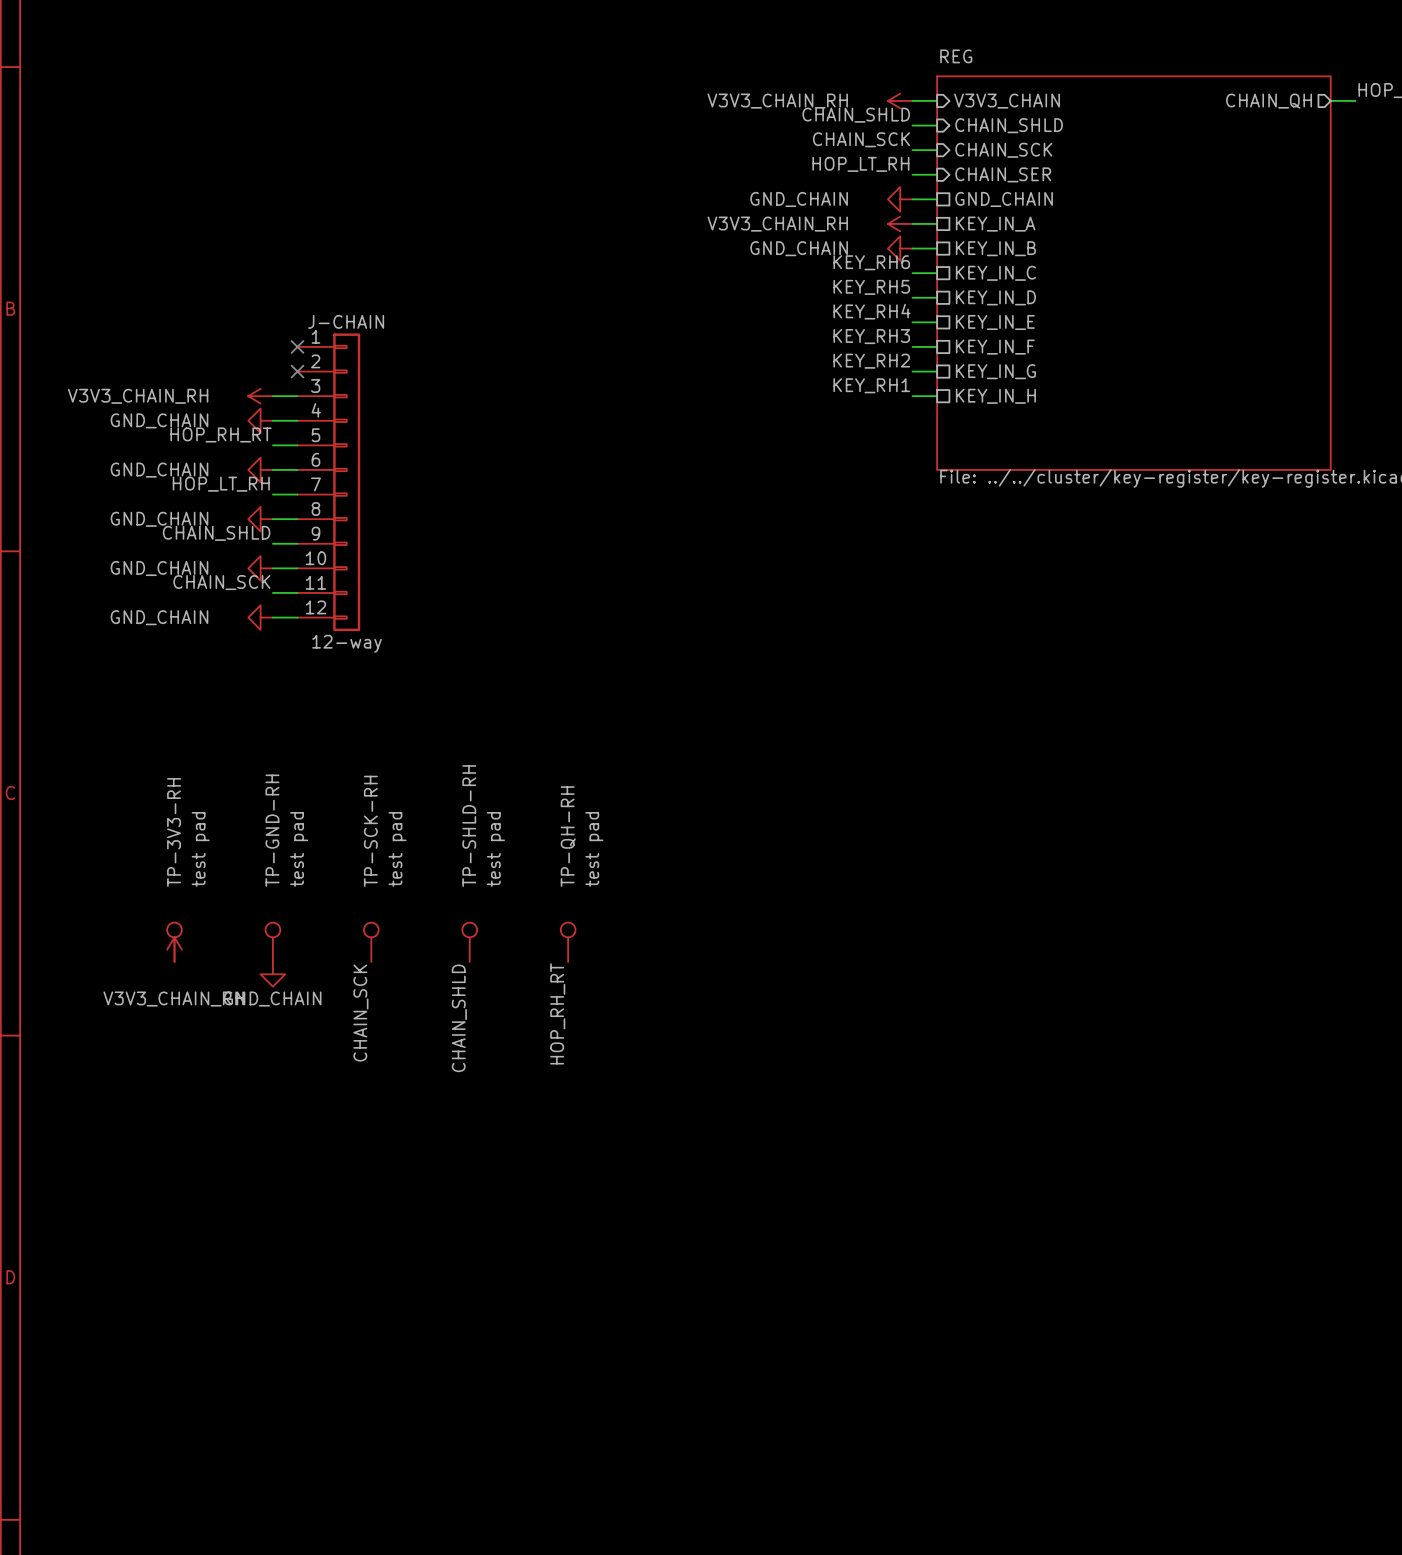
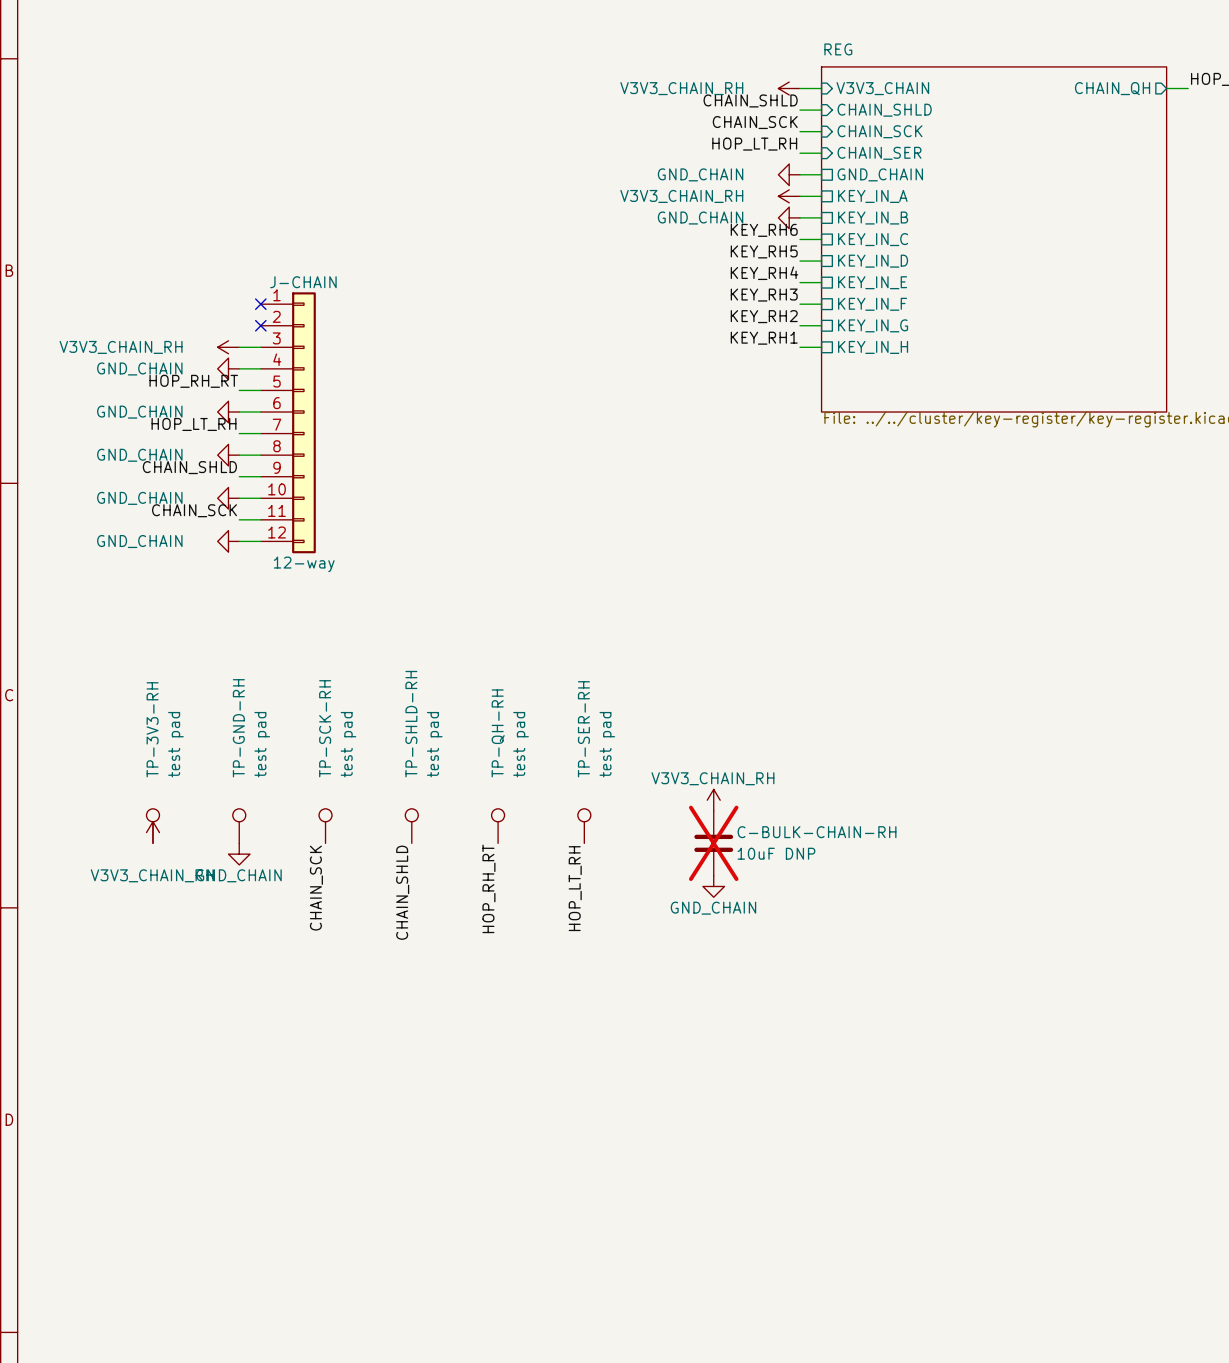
power symbol: none -> V3V3_CHAIN_RH (713, 800)
TP-SER-RH: none -> test pad (584, 826)
C-BULK-CHAIN-RH: none -> 10uF DNP (713, 843)
power symbol: none -> GND_CHAIN (713, 886)
label: none -> HOP_LT_RH (575, 888)

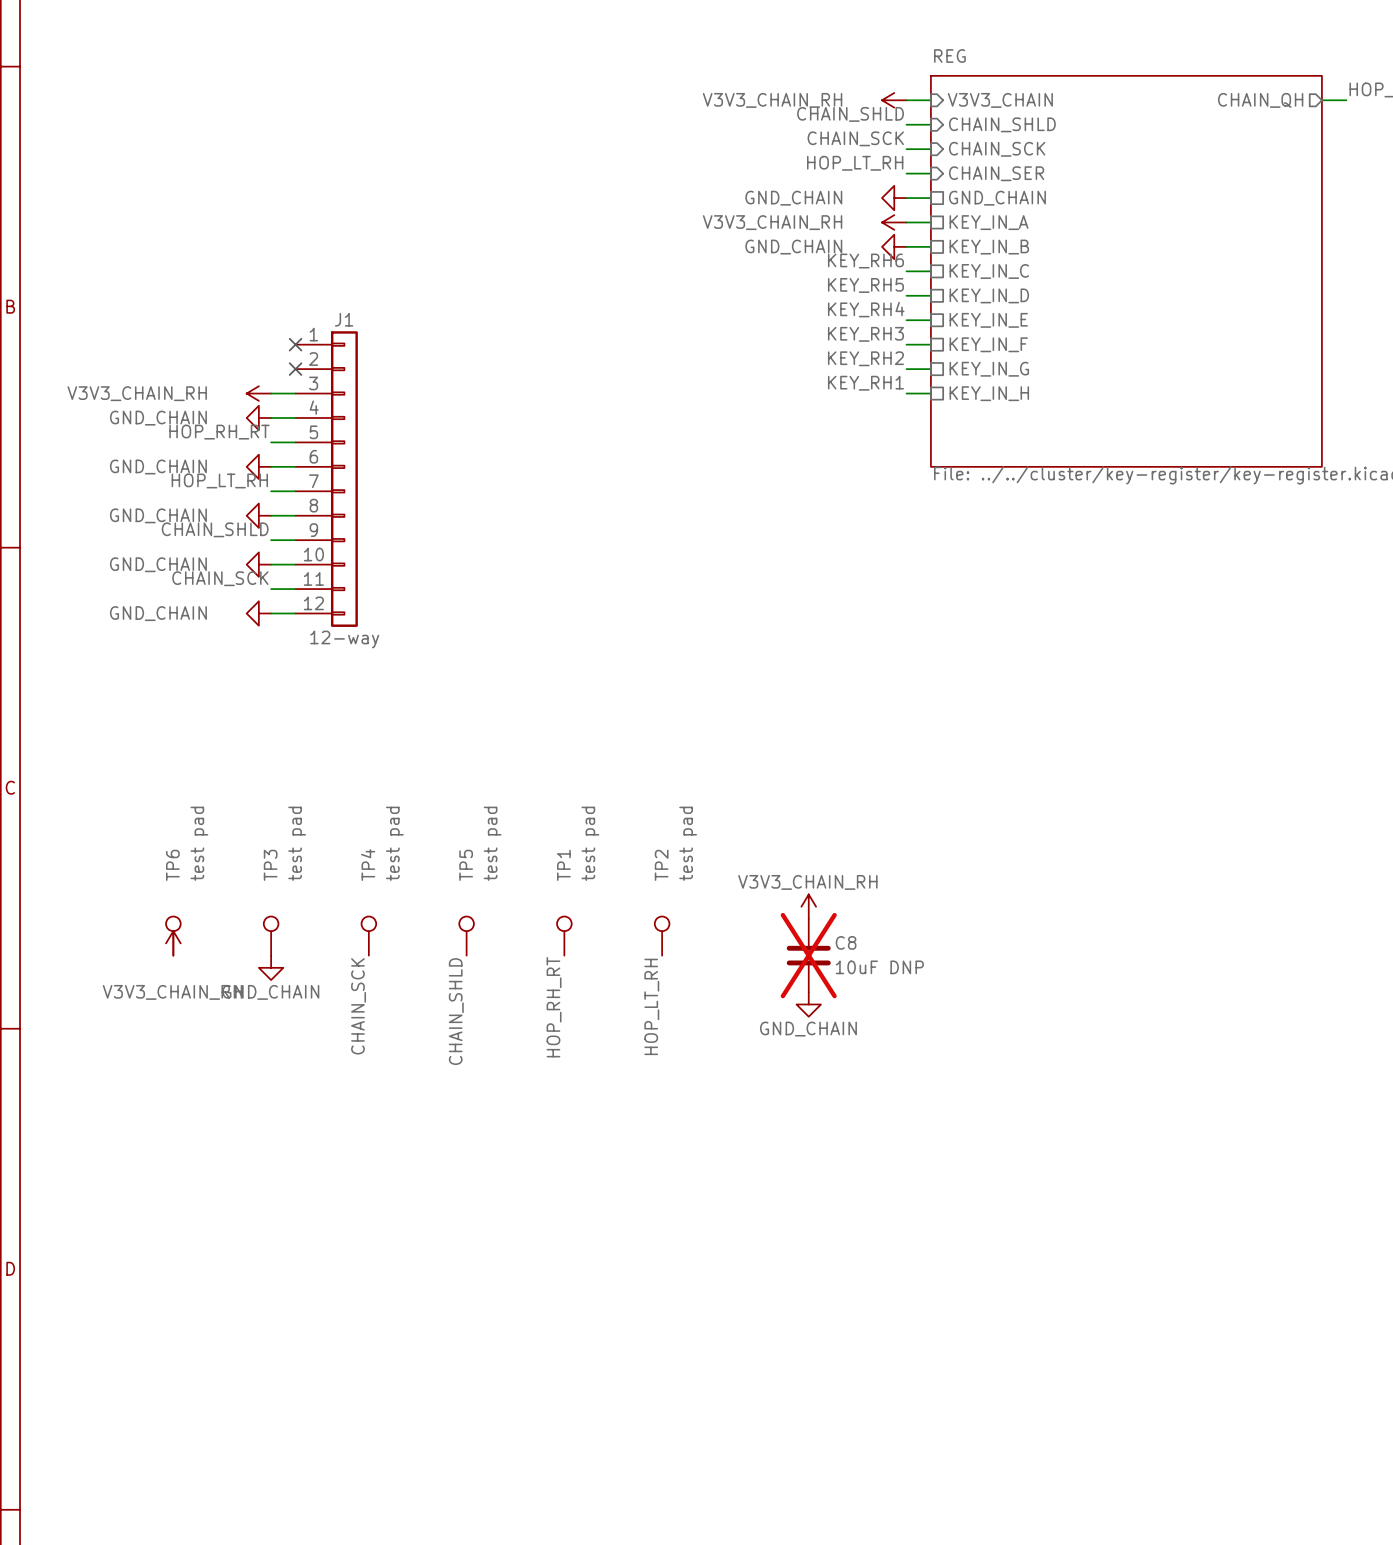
J-CHAIN name: J-CHAIN (303, 282) -> J1 (344, 319)
TP-SHLD-RH name: TP-SHLD-RH (411, 724) -> TP5 (466, 865)
TP-GND-RH name: TP-GND-RH (238, 728) -> TP3 (270, 865)
TP-SCK-RH name: TP-SCK-RH (325, 728) -> TP4 (368, 865)
TP-3V3-RH name: TP-3V3-RH (152, 729) -> TP6 (172, 865)
TP-SER-RH name: TP-SER-RH (583, 729) -> TP2 (661, 865)
TP-QH-RH name: TP-QH-RH (498, 733) -> TP1 (563, 865)
C-BULK-CHAIN-RH name: C-BULK-CHAIN-RH (817, 832) -> C8 (846, 942)

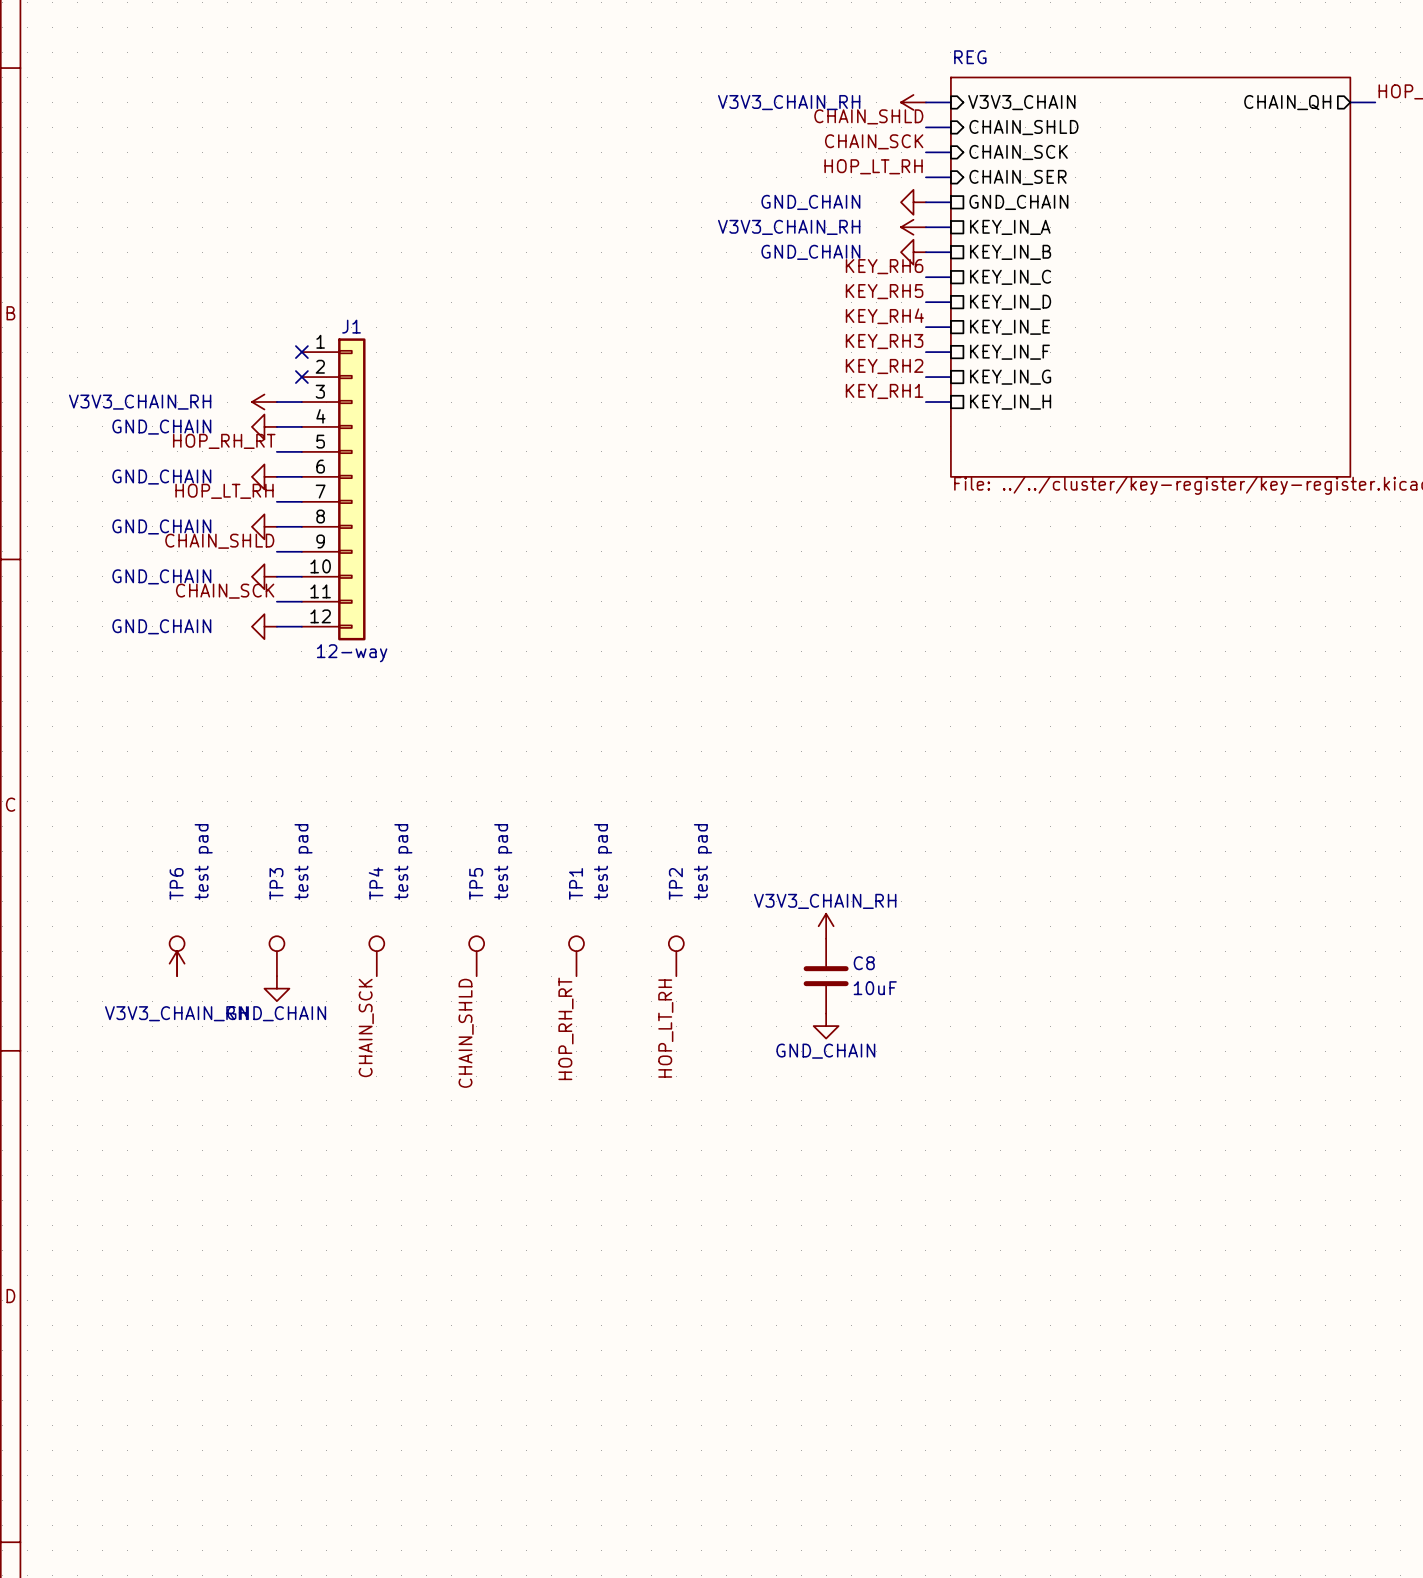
C8 do-not-place cross: (808, 955) -> none
C8 value: 10uF DNP (879, 967) -> 10uF (875, 988)

